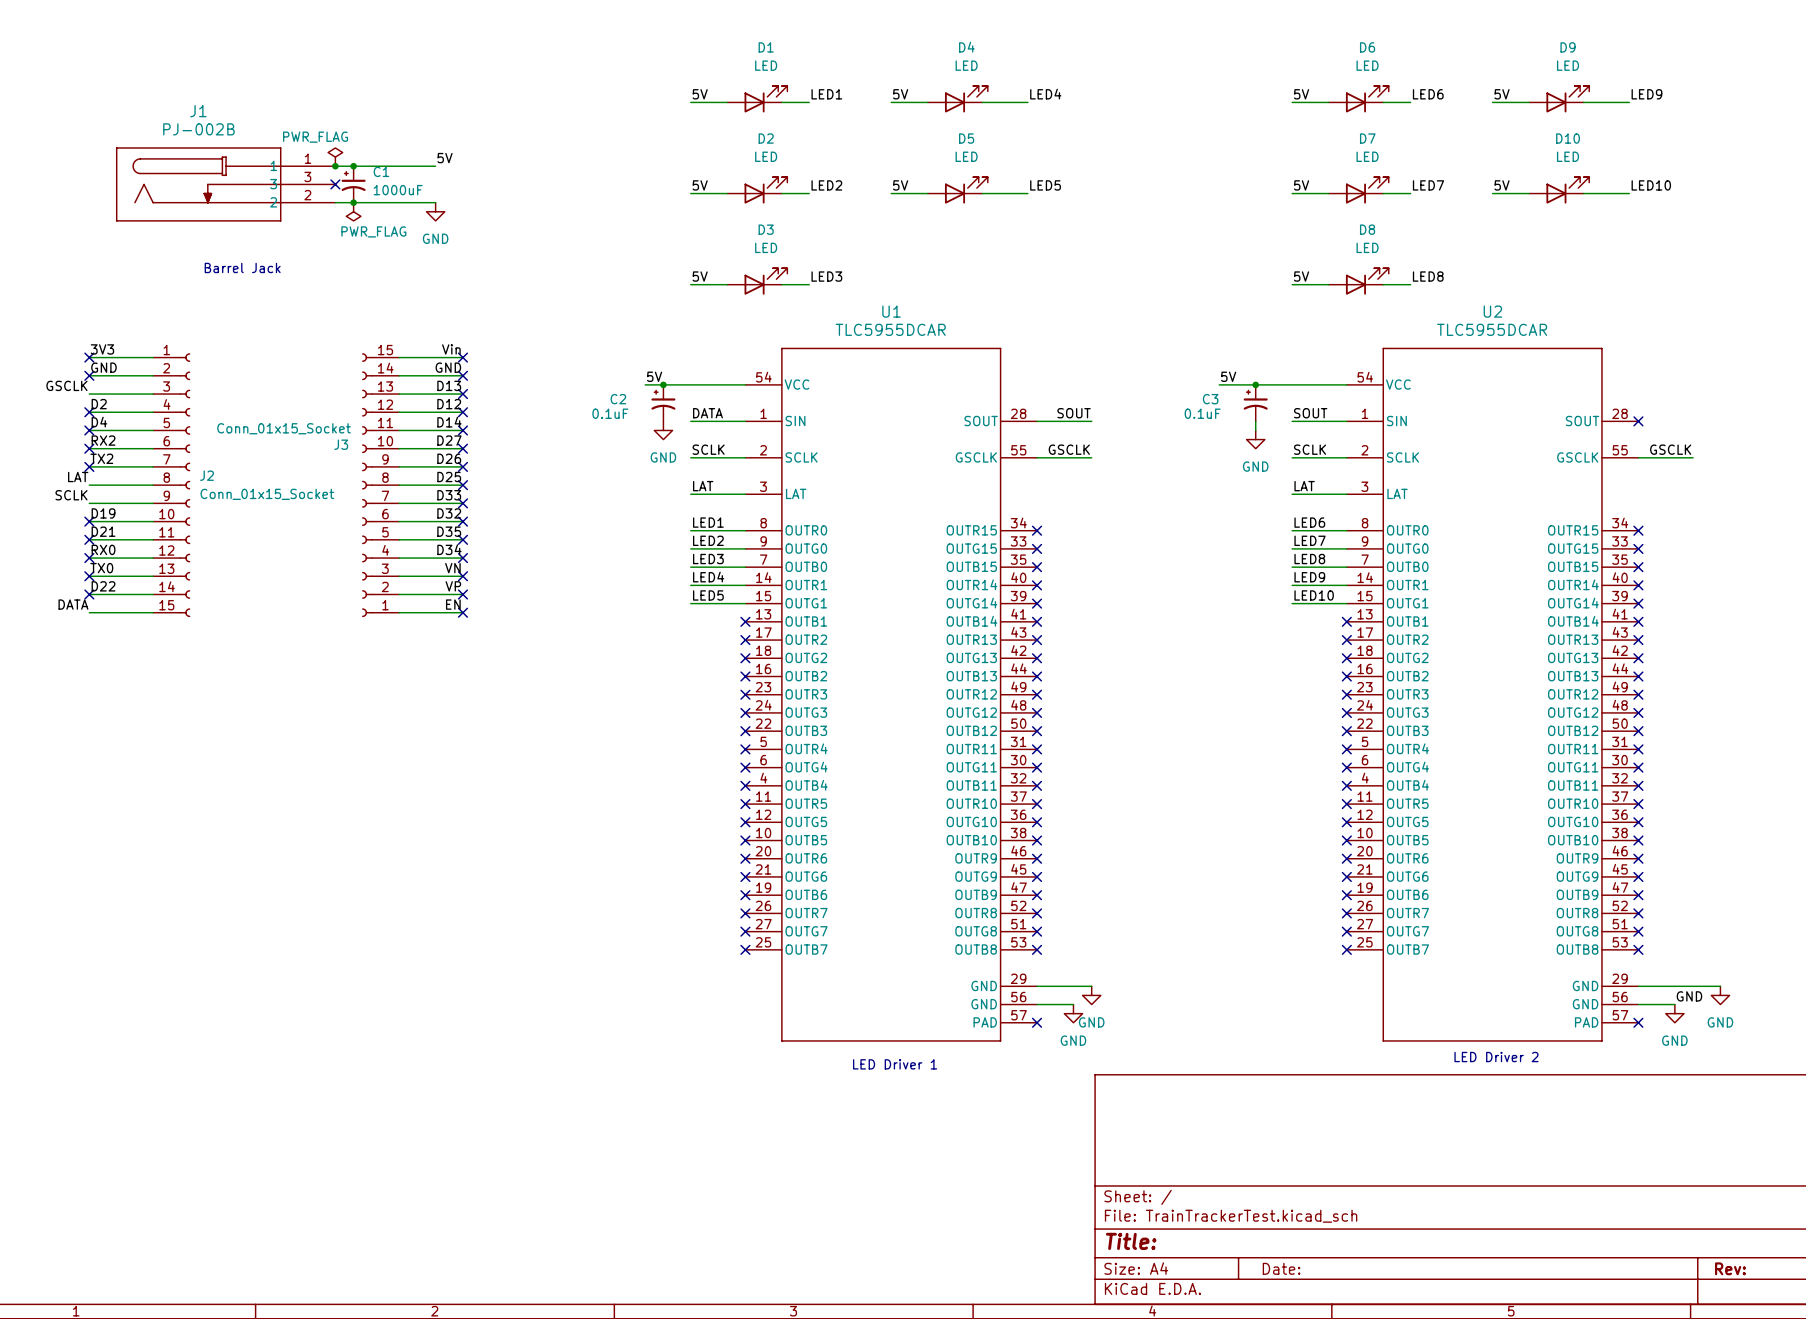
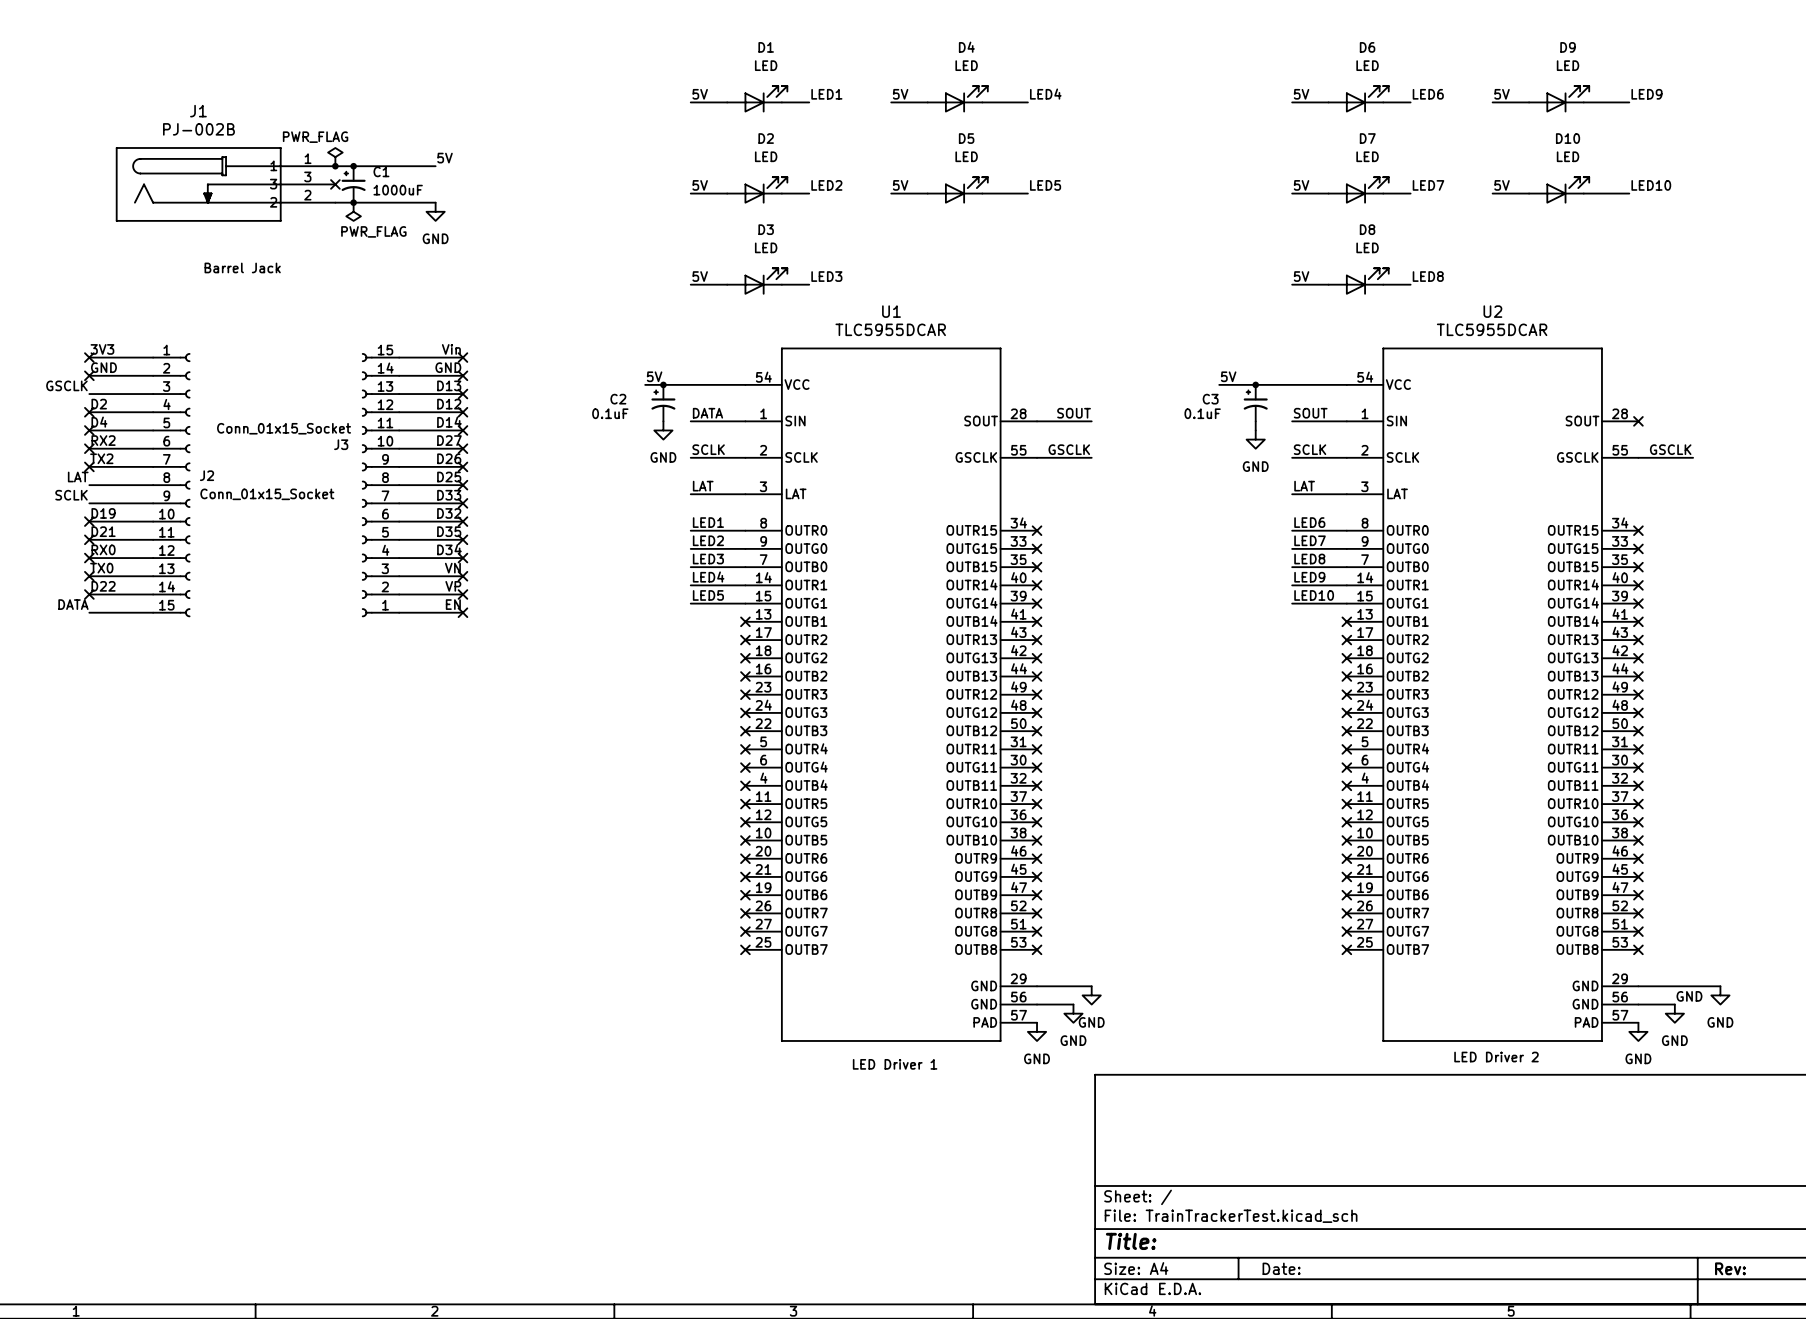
no-connect mark: (1037, 1022) -> none
no-connect mark: (1638, 1022) -> none
power symbol: none -> GND (1037, 1031)
power symbol: none -> GND (1638, 1031)

